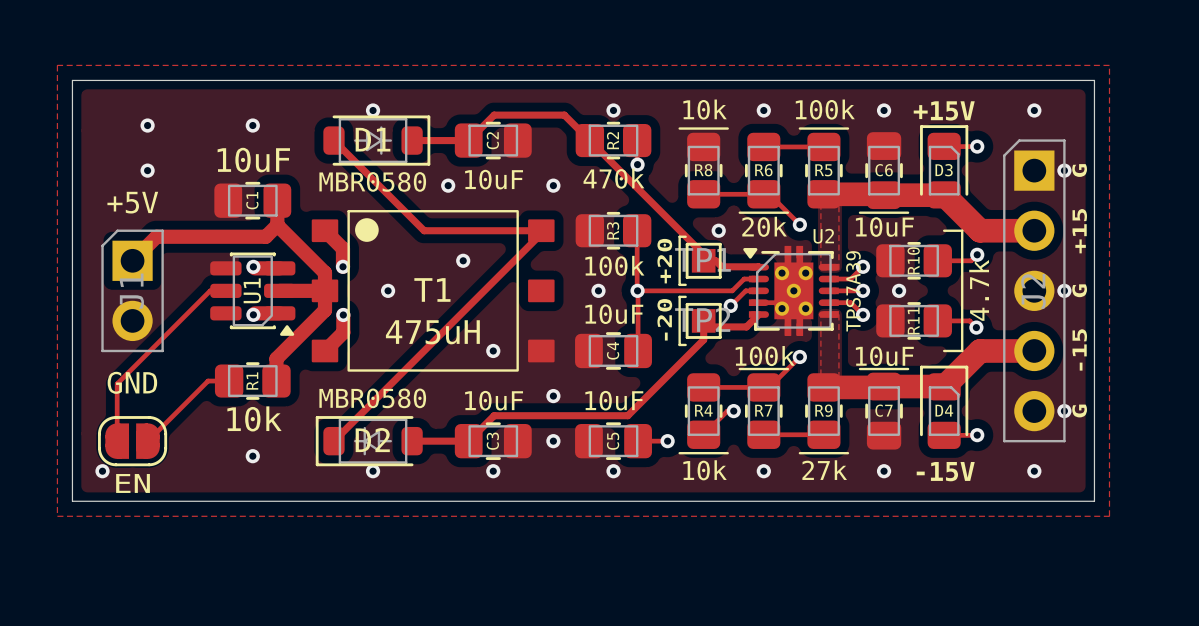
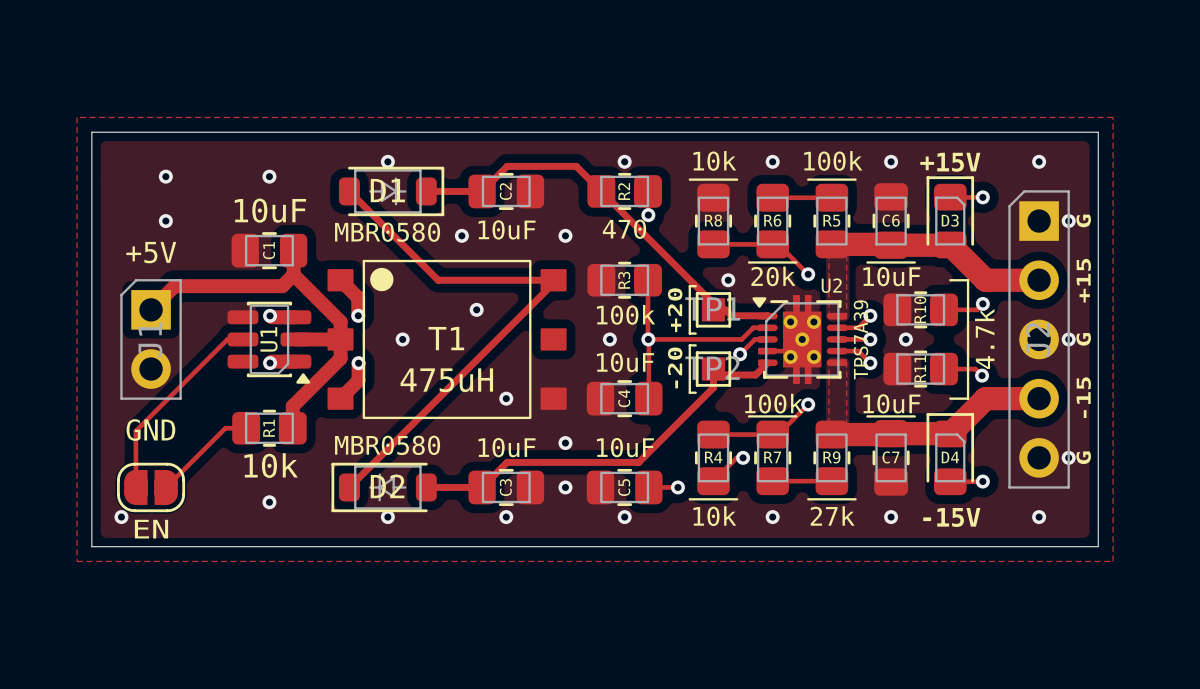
R2 value: 470k (613, 178) -> 470 (624, 229)

